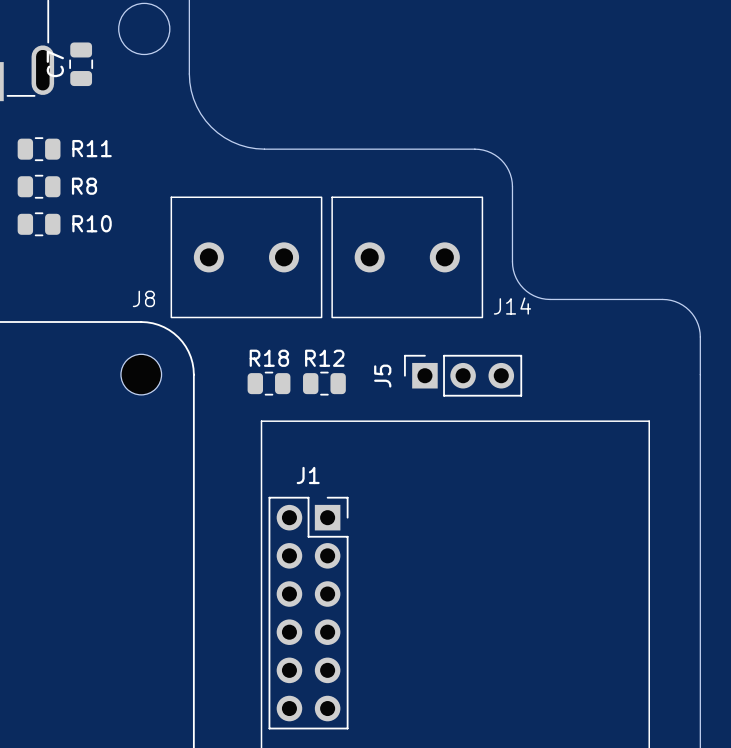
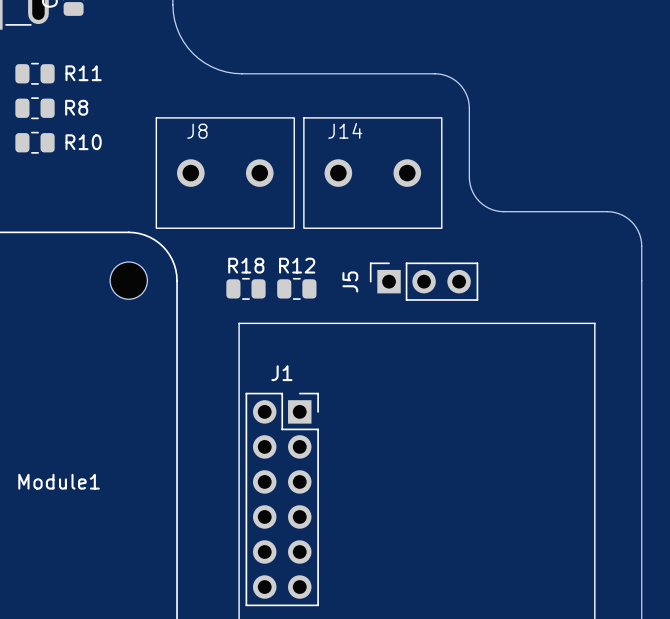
J8 name position: J8 (143, 298) -> J8 (197, 131)
J14 name position: J14 (512, 306) -> J14 (345, 130)
Module1 name: none -> Module1 (59, 481)

